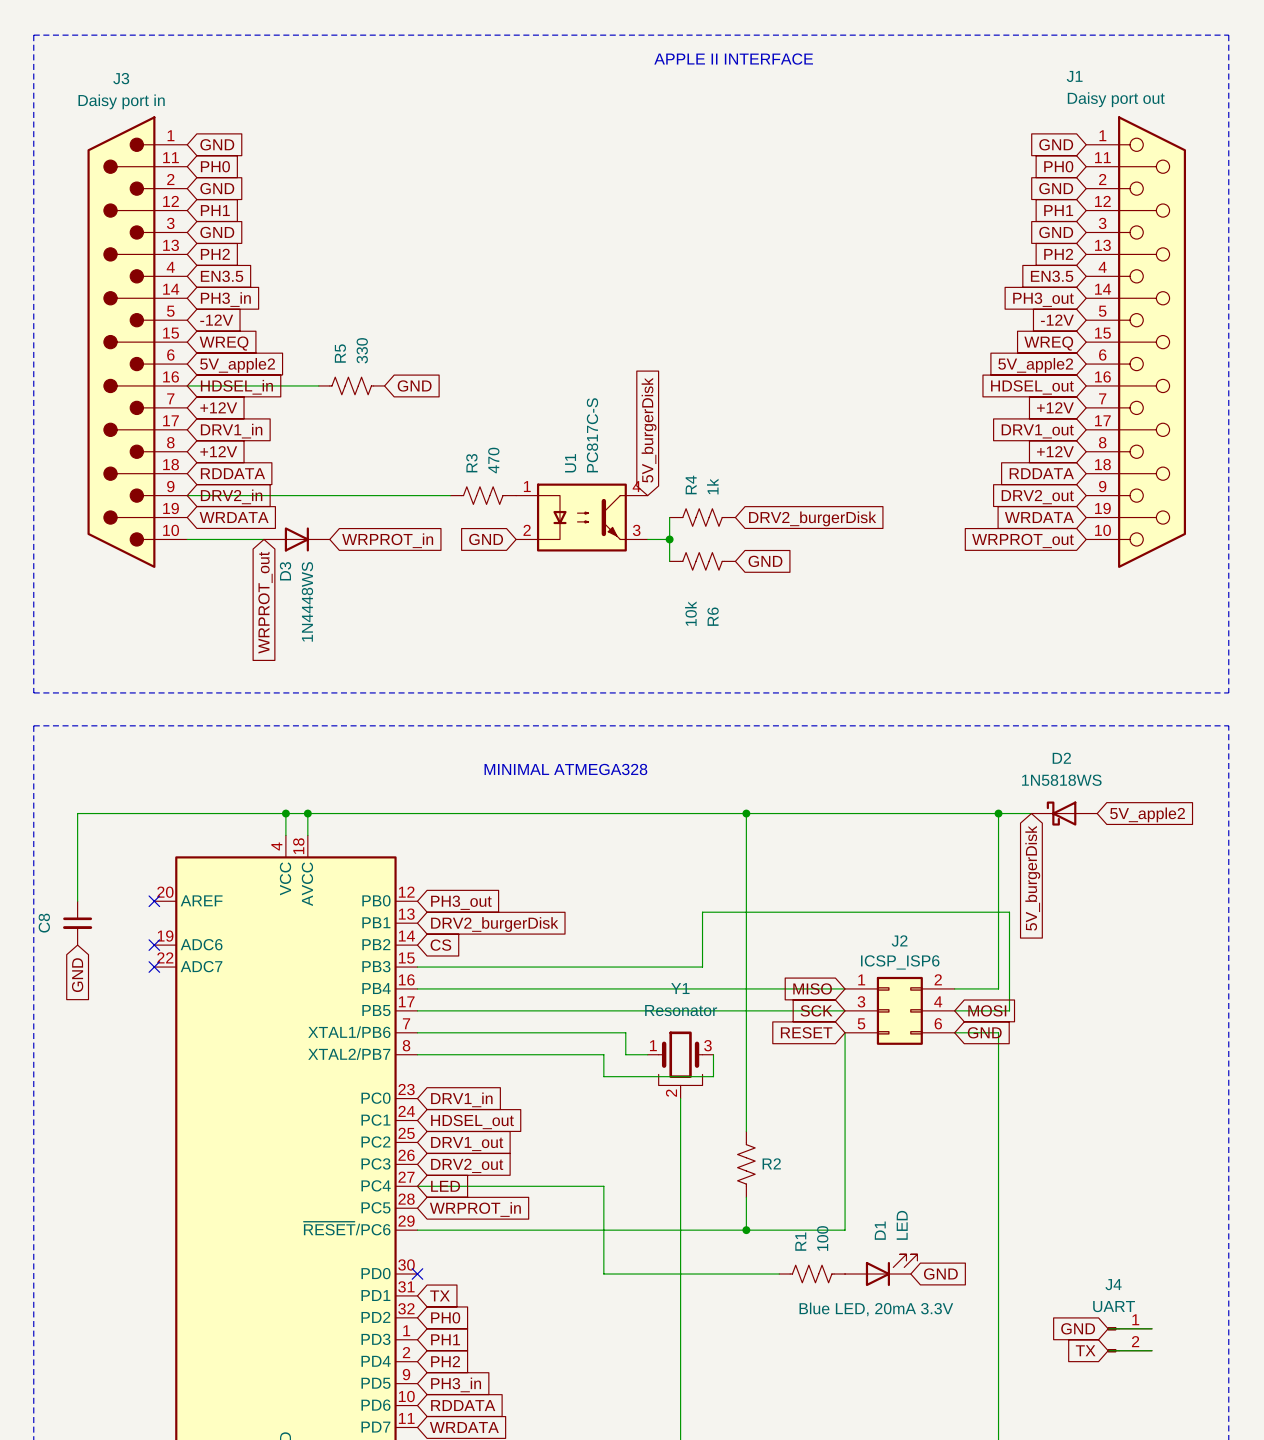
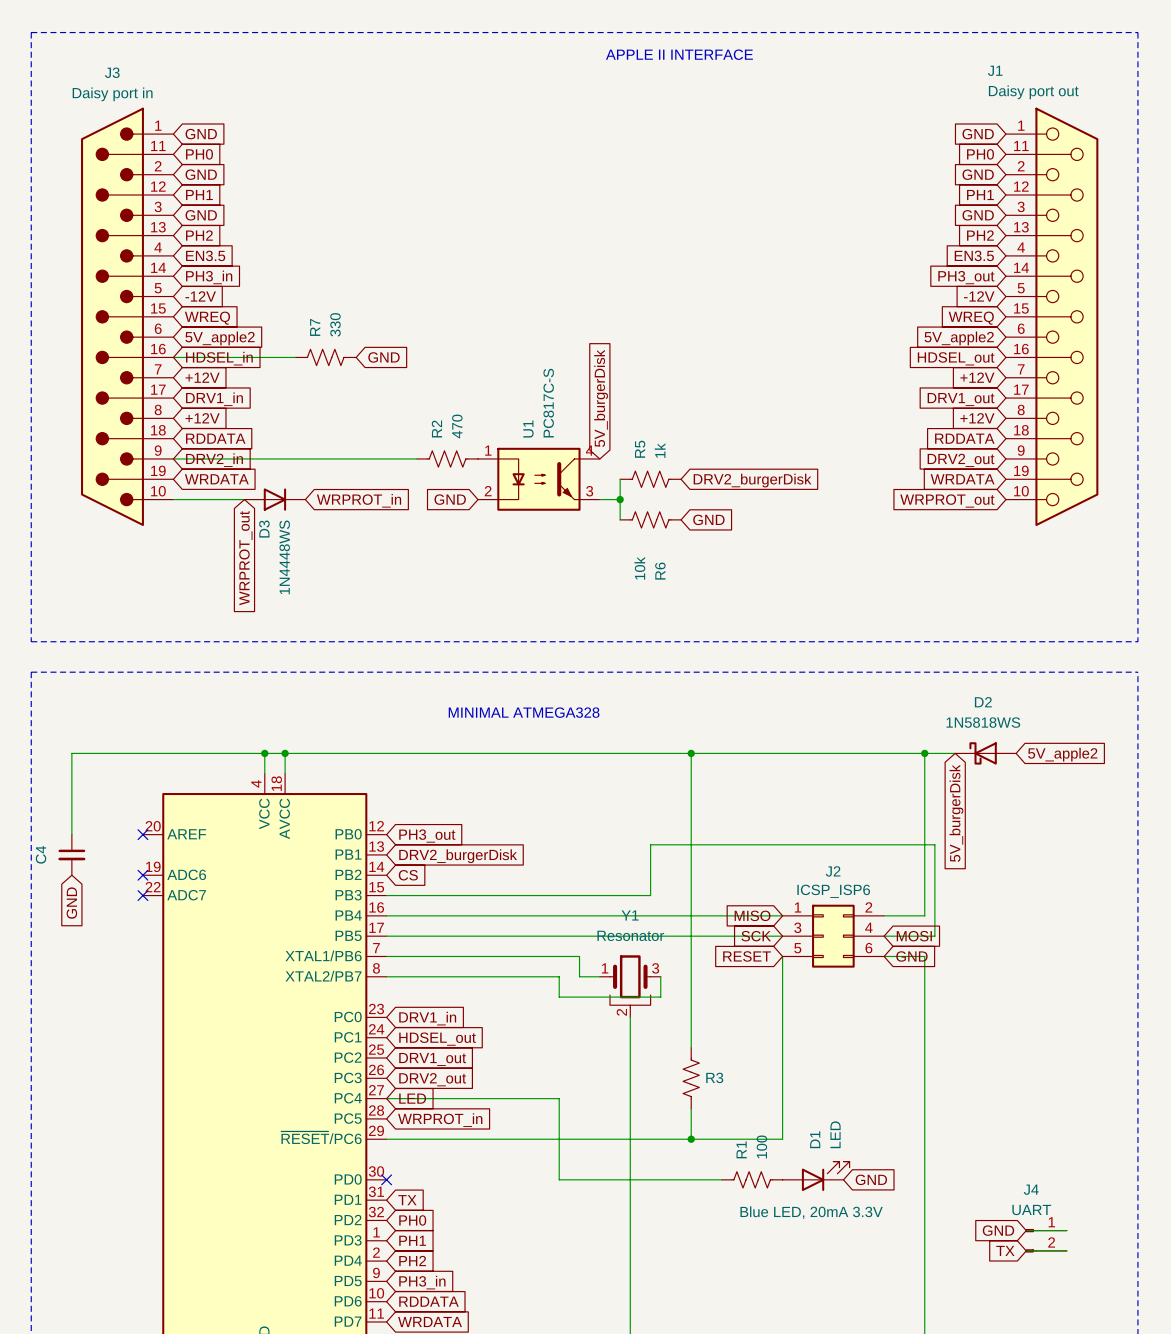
R5 name: R5 (340, 353) -> R7 (315, 327)
R3 name: R3 (471, 463) -> R2 (436, 429)
R4 name: R4 (691, 485) -> R5 (640, 449)
C8 name: C8 (44, 923) -> C4 (41, 854)
R2 name: R2 (771, 1163) -> R3 (714, 1077)

